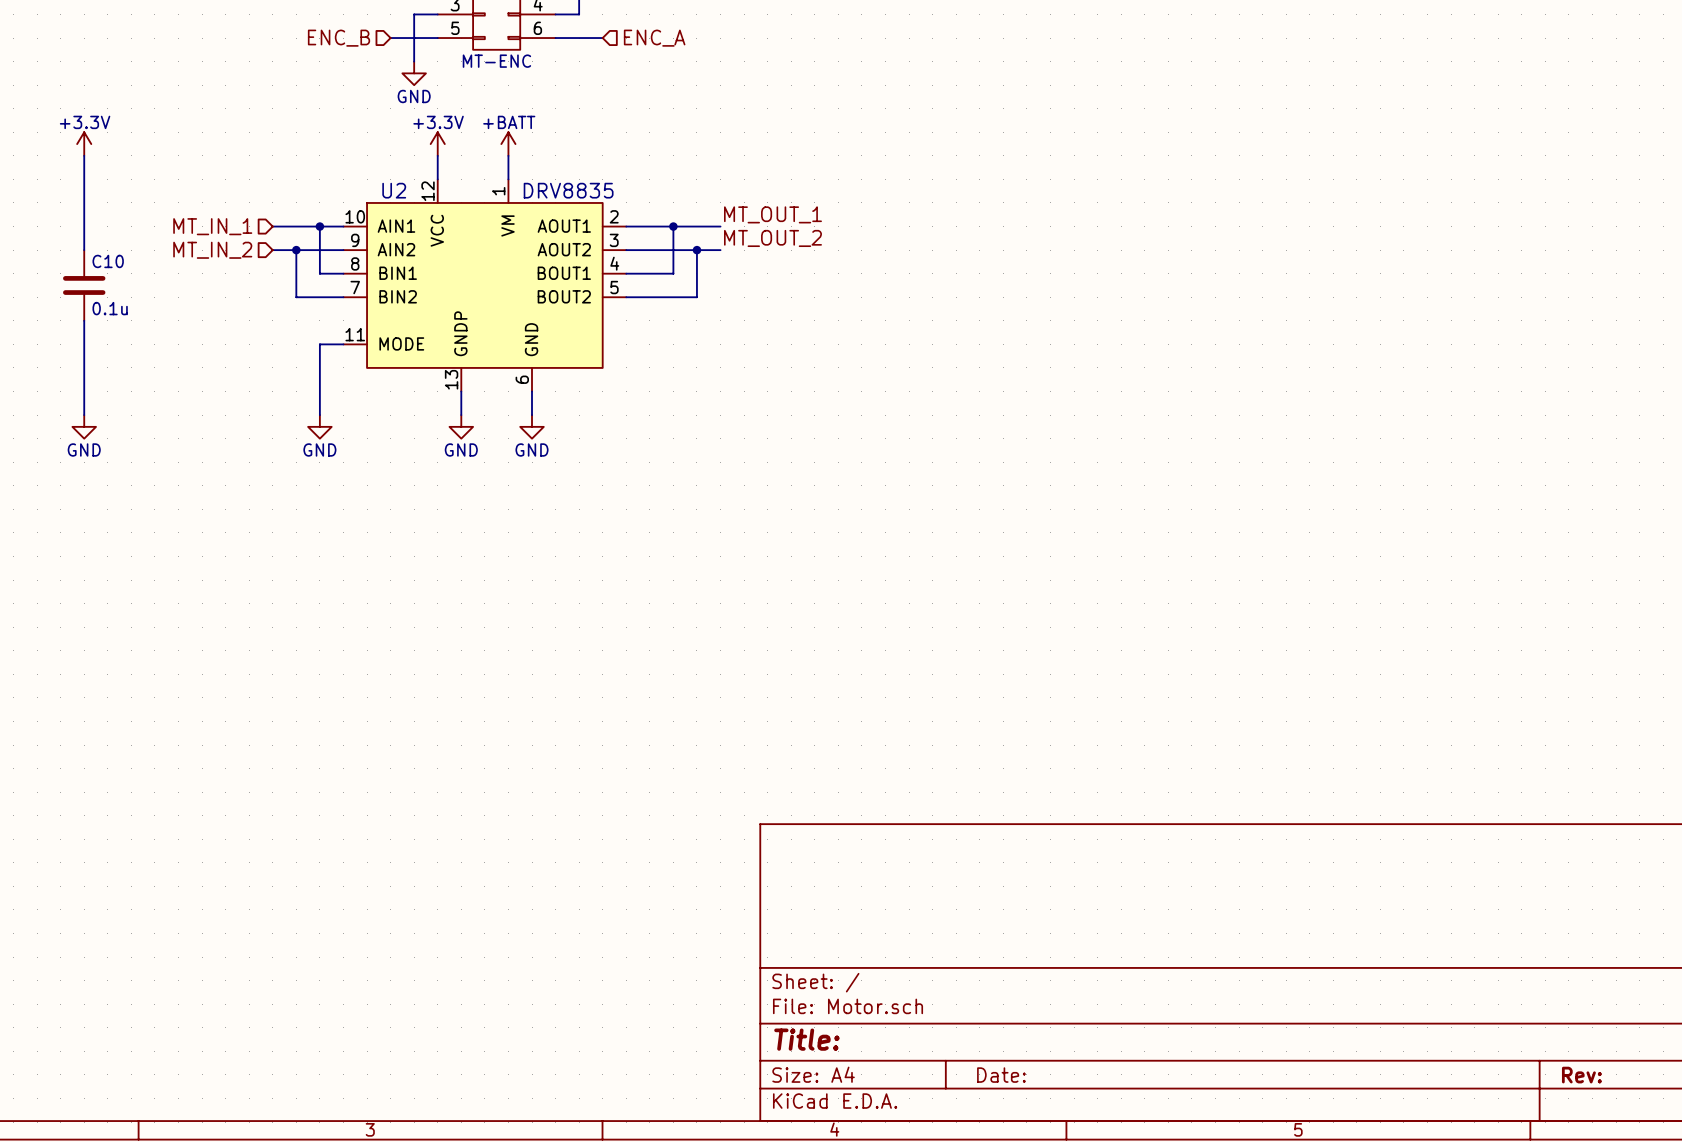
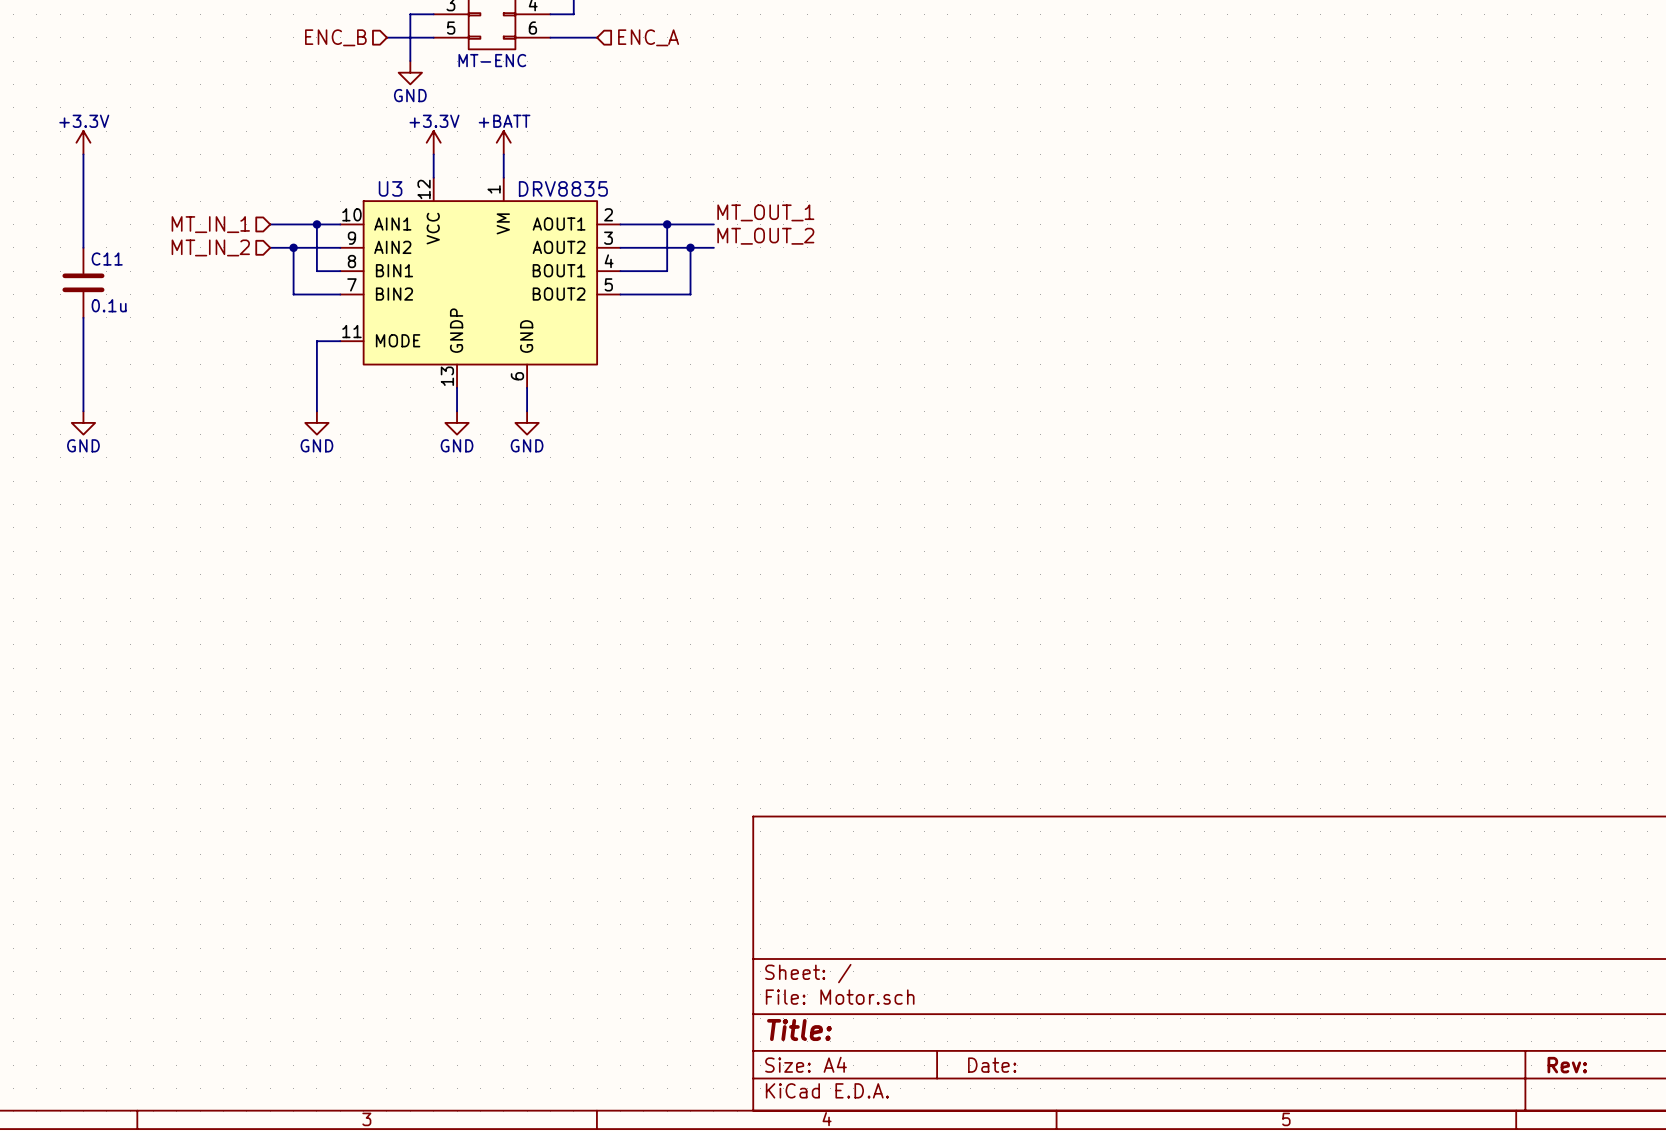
U2 name: U2 (394, 190) -> U3 (390, 188)
C10 name: C10 (108, 261) -> C11 (107, 259)

